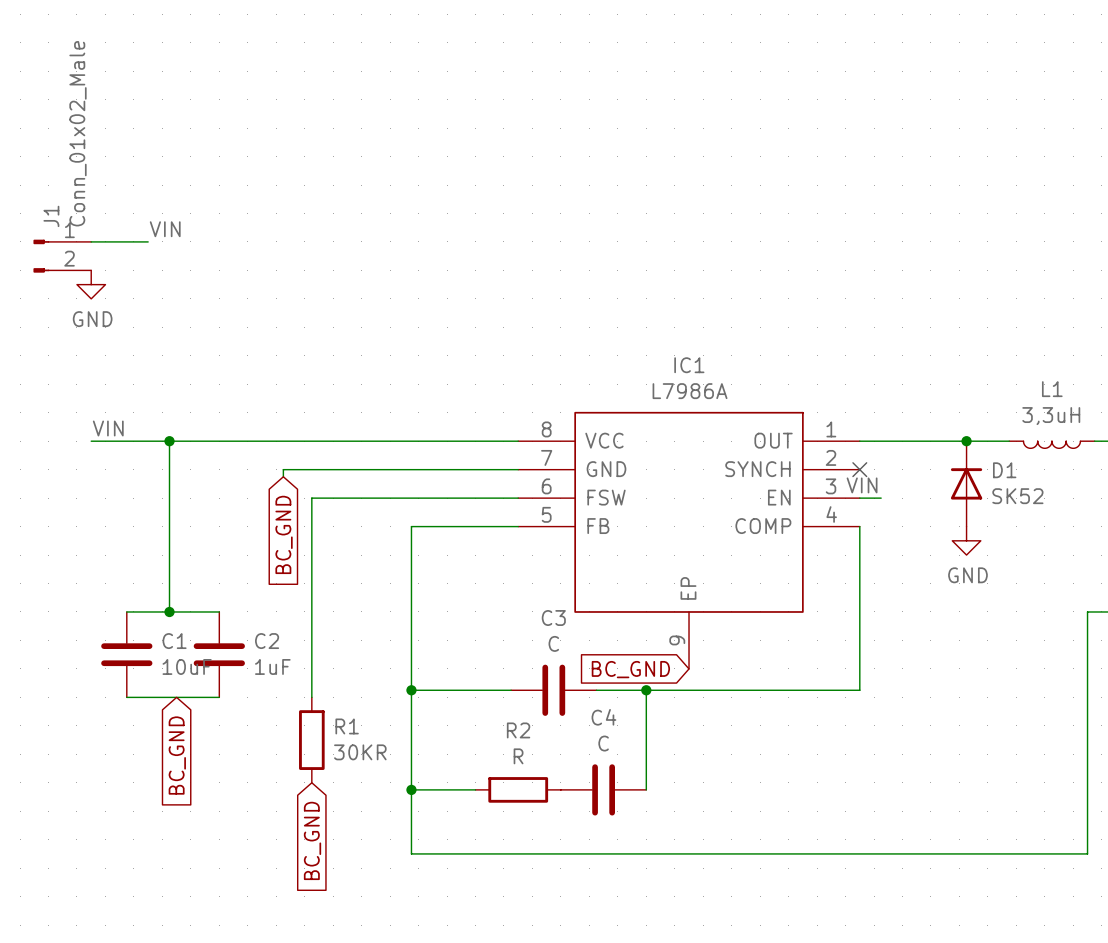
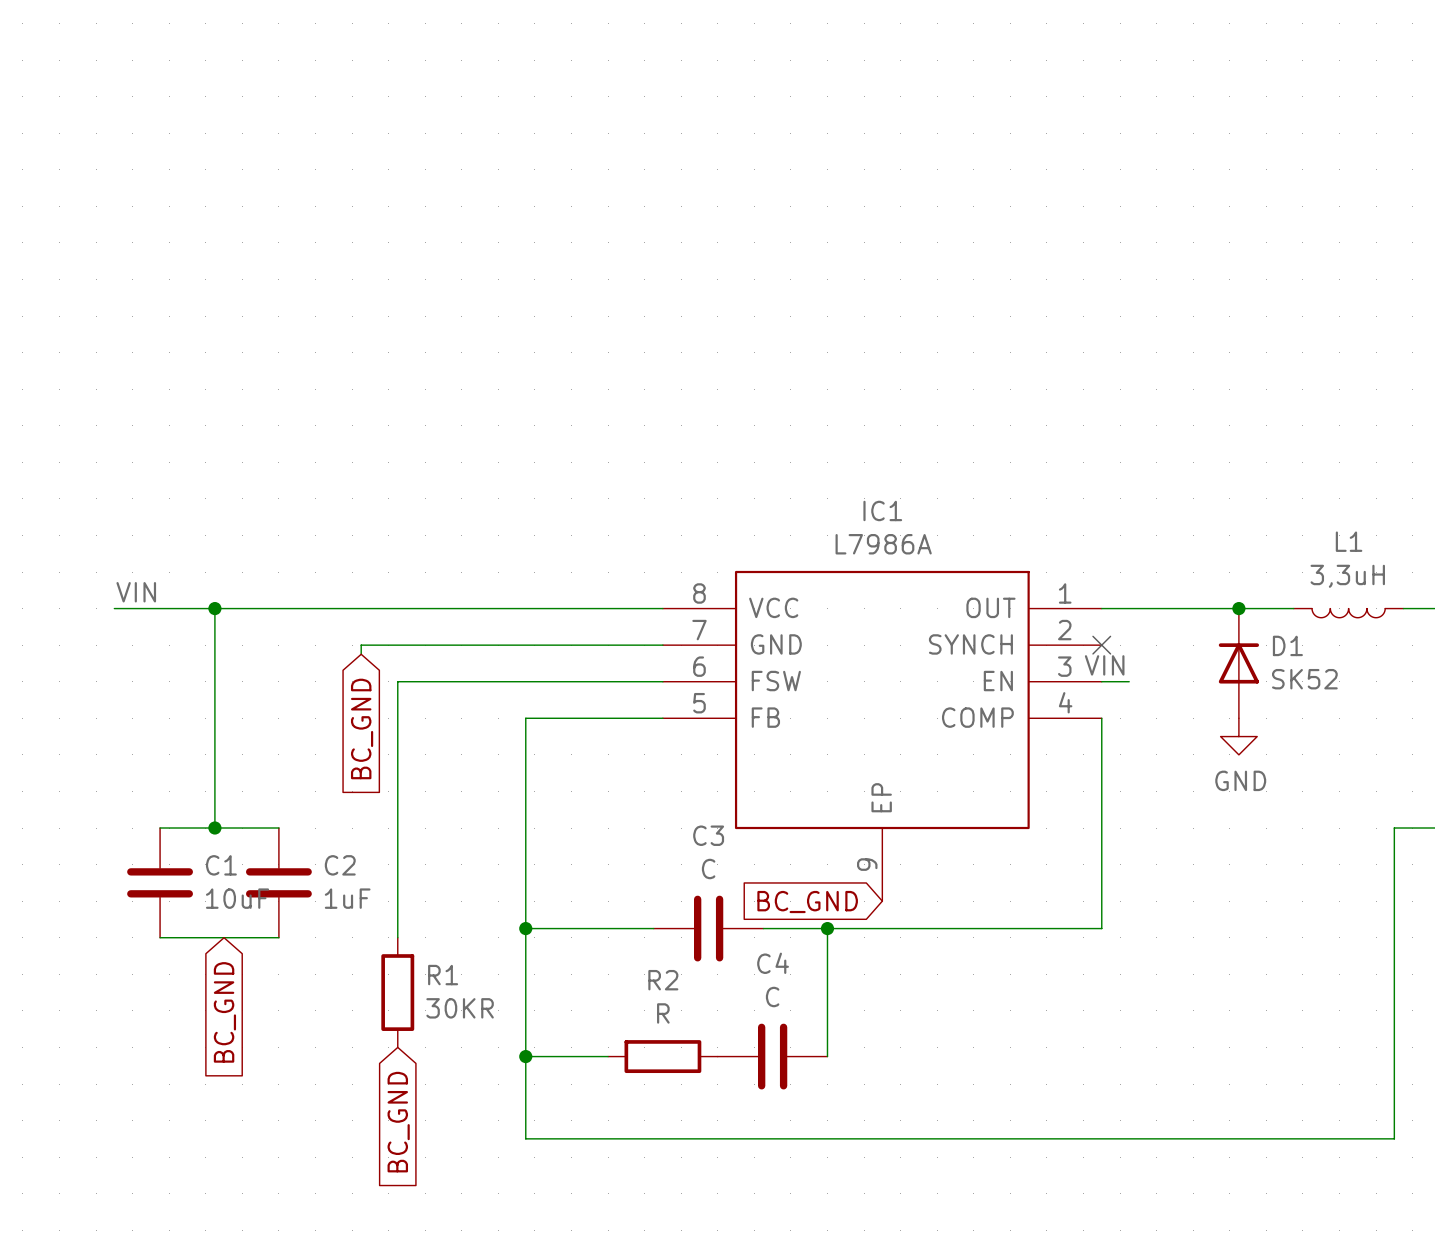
label: VIN (165, 229) -> none
wire: (91, 241) (148, 241) -> none
J1: Conn_01x02_Male (62, 256) -> none
power symbol: GND (91, 284) -> none

